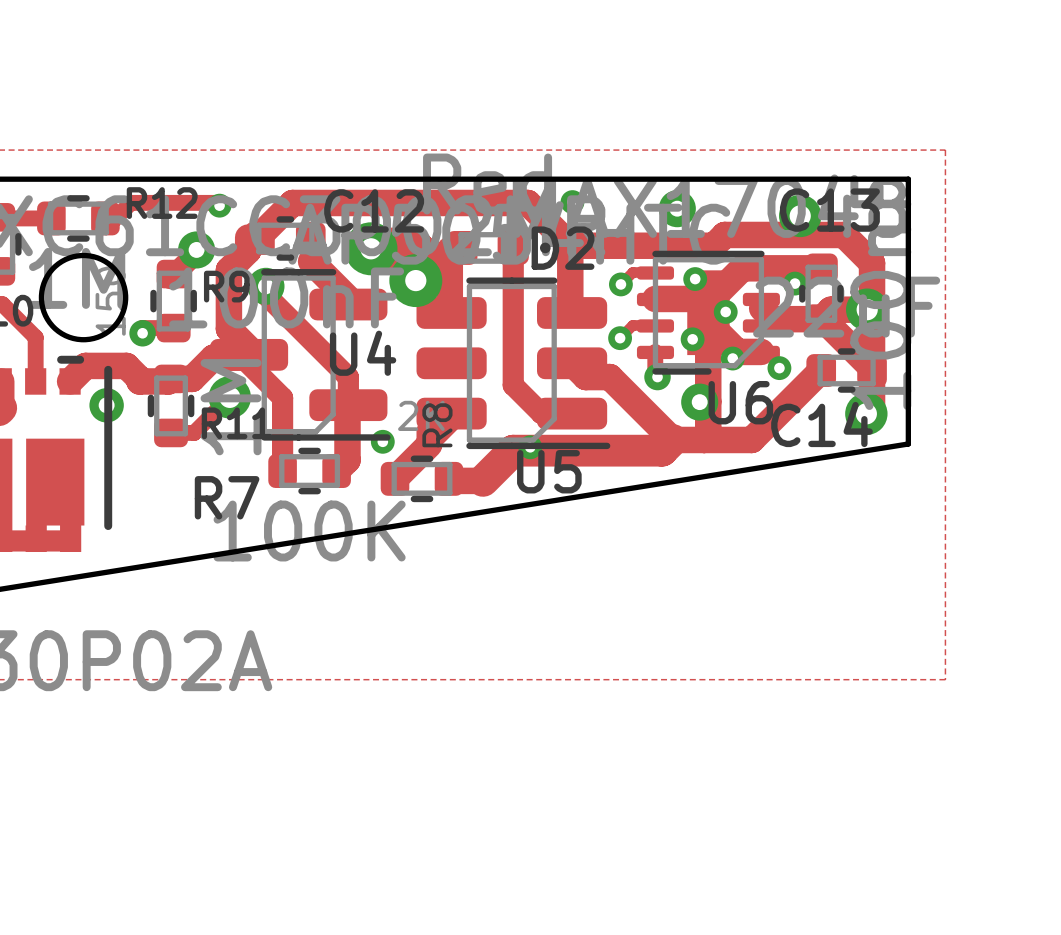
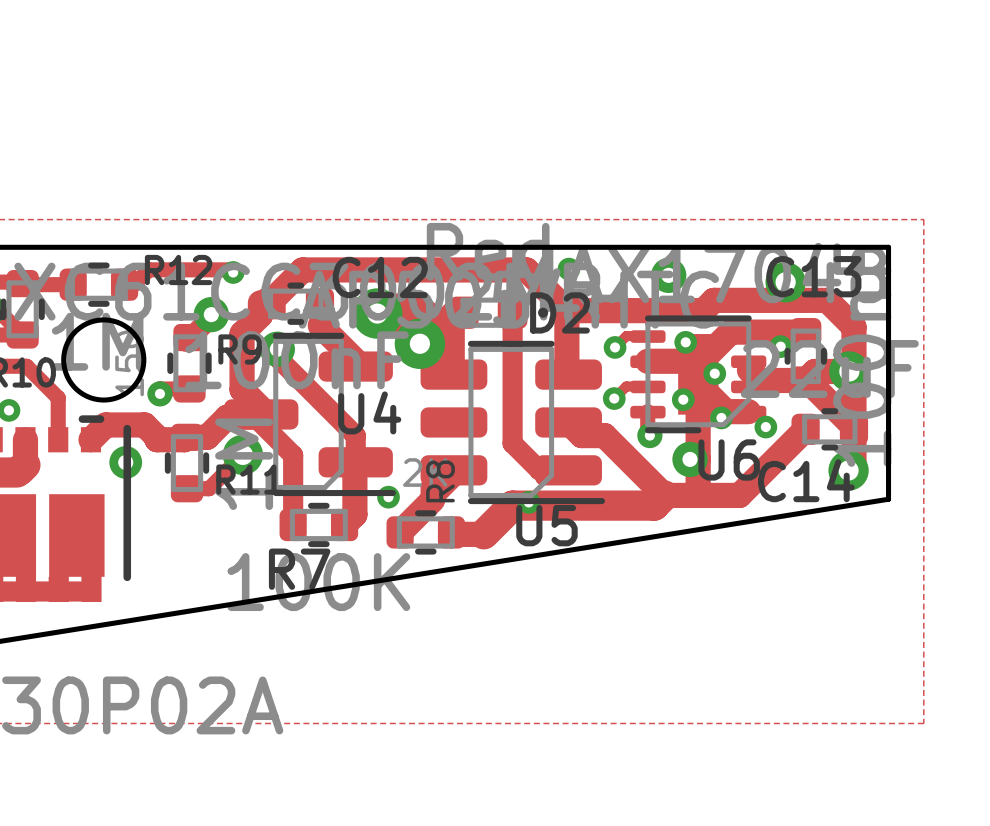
R7 name position: R7 (227, 497) -> R7 (299, 569)

